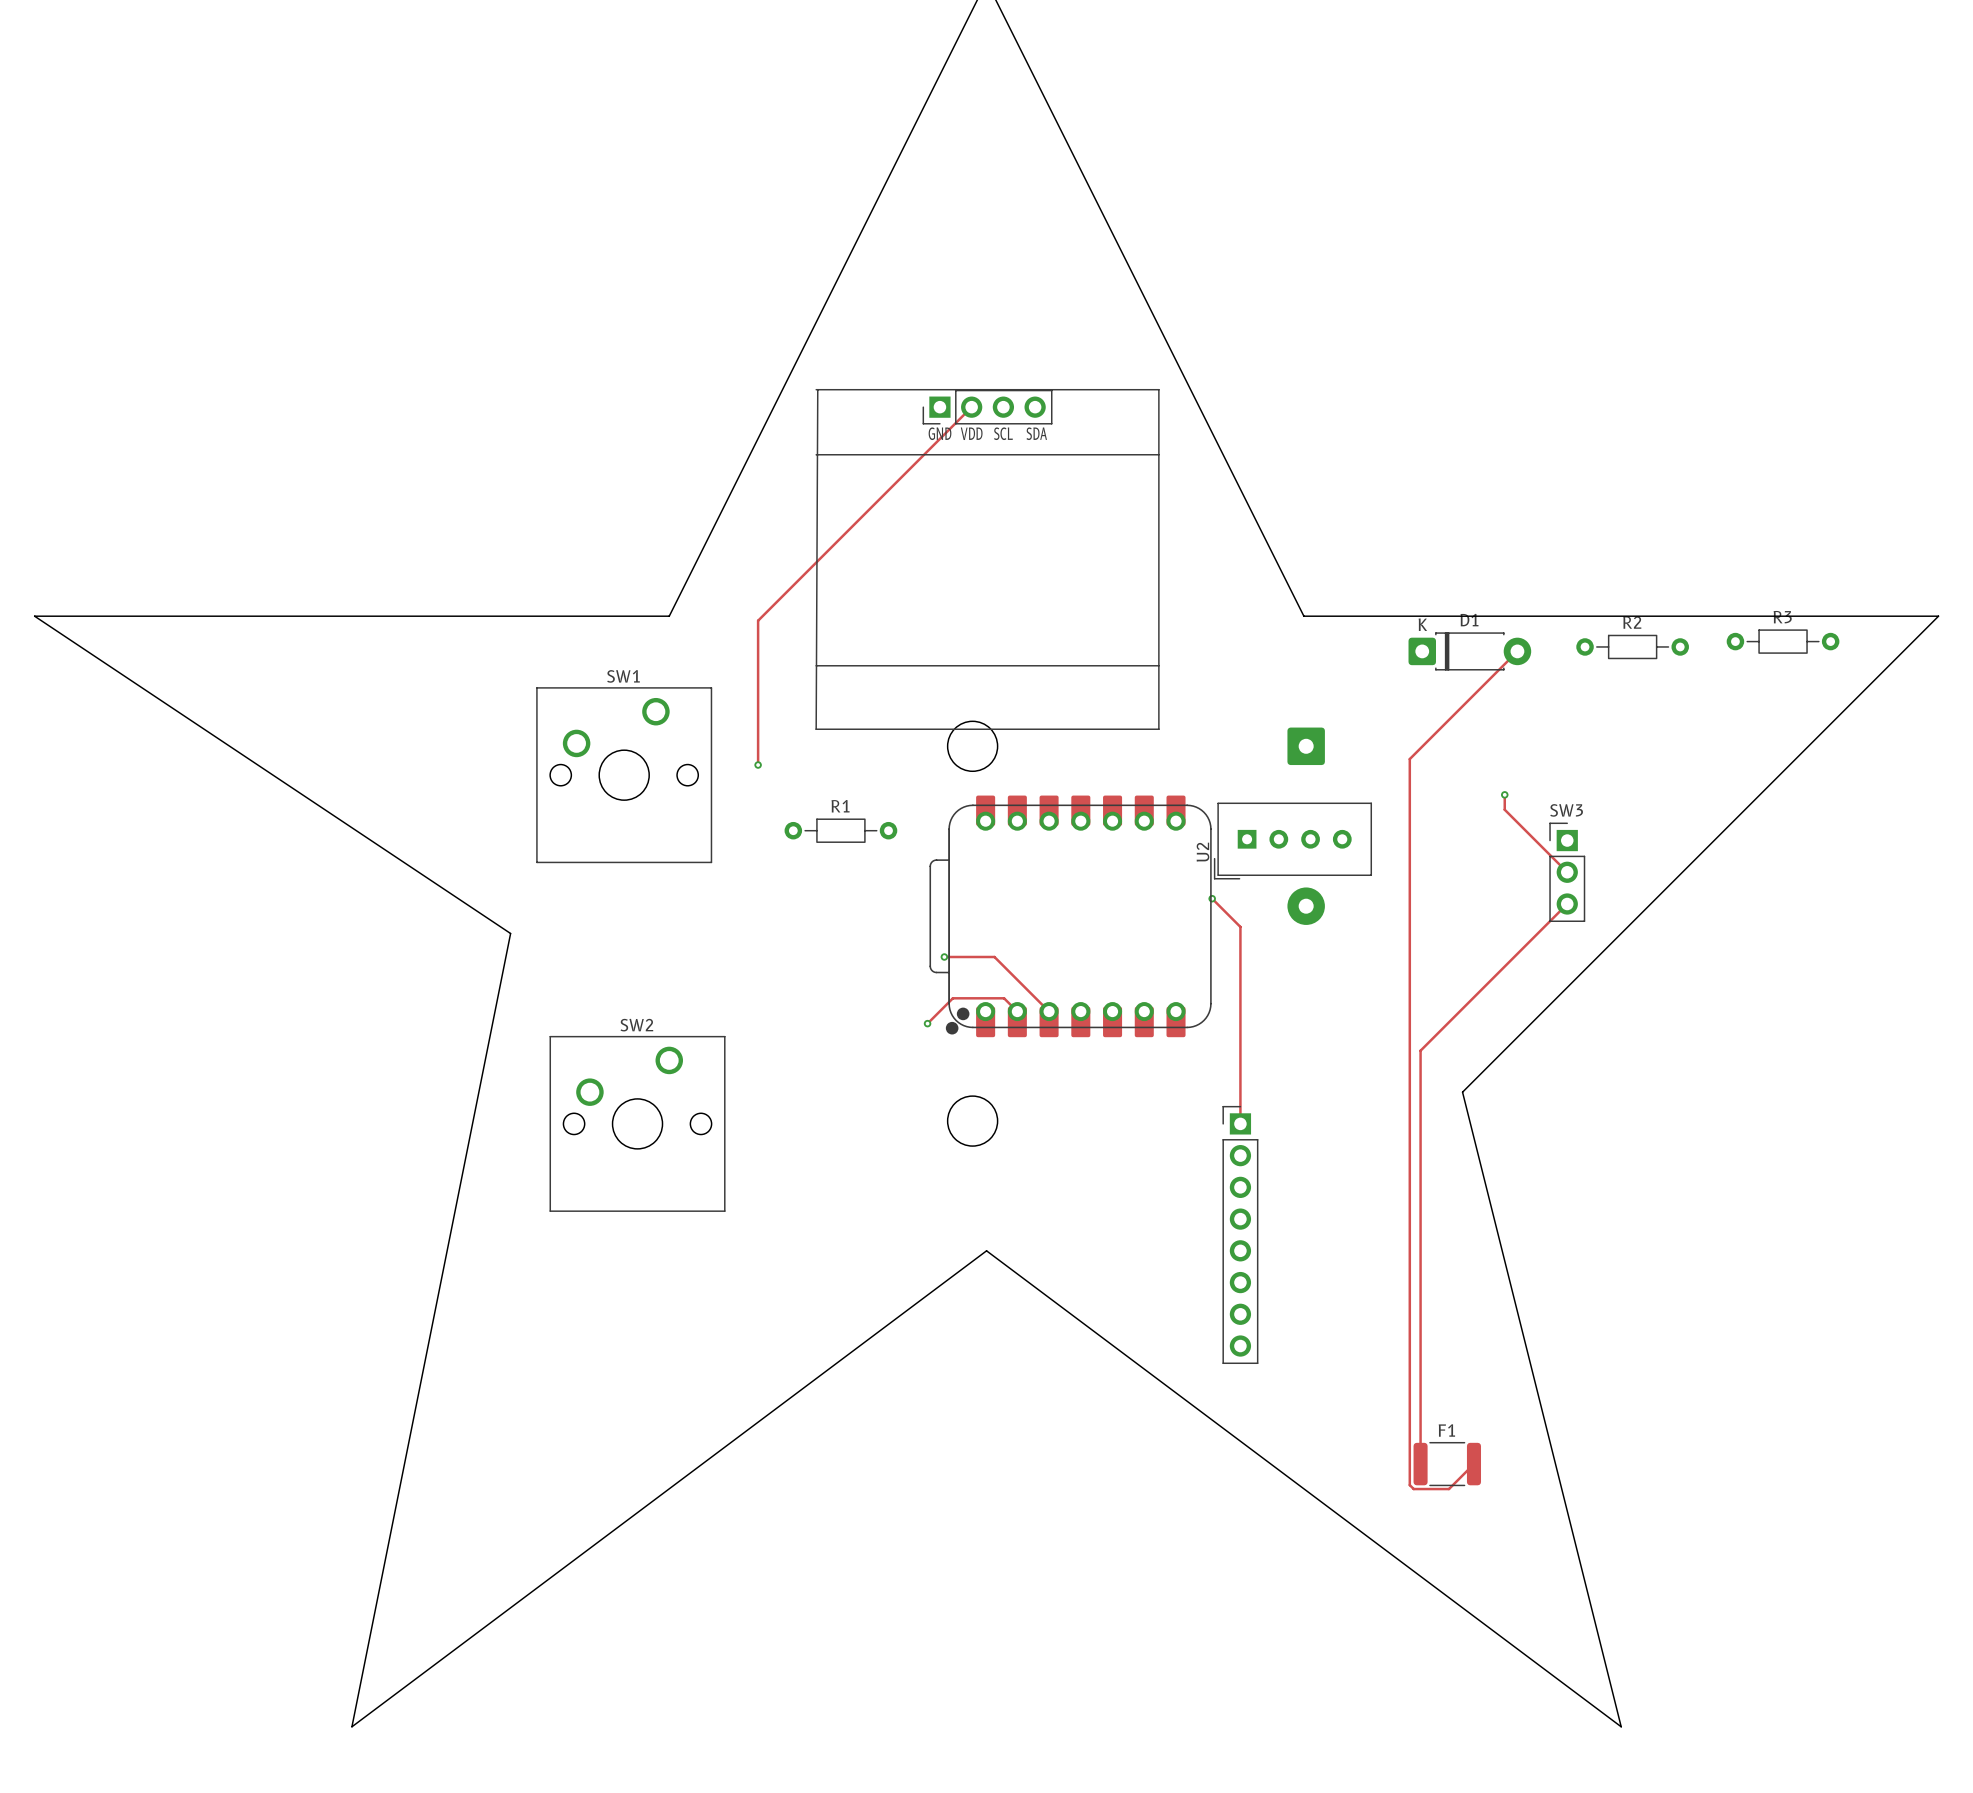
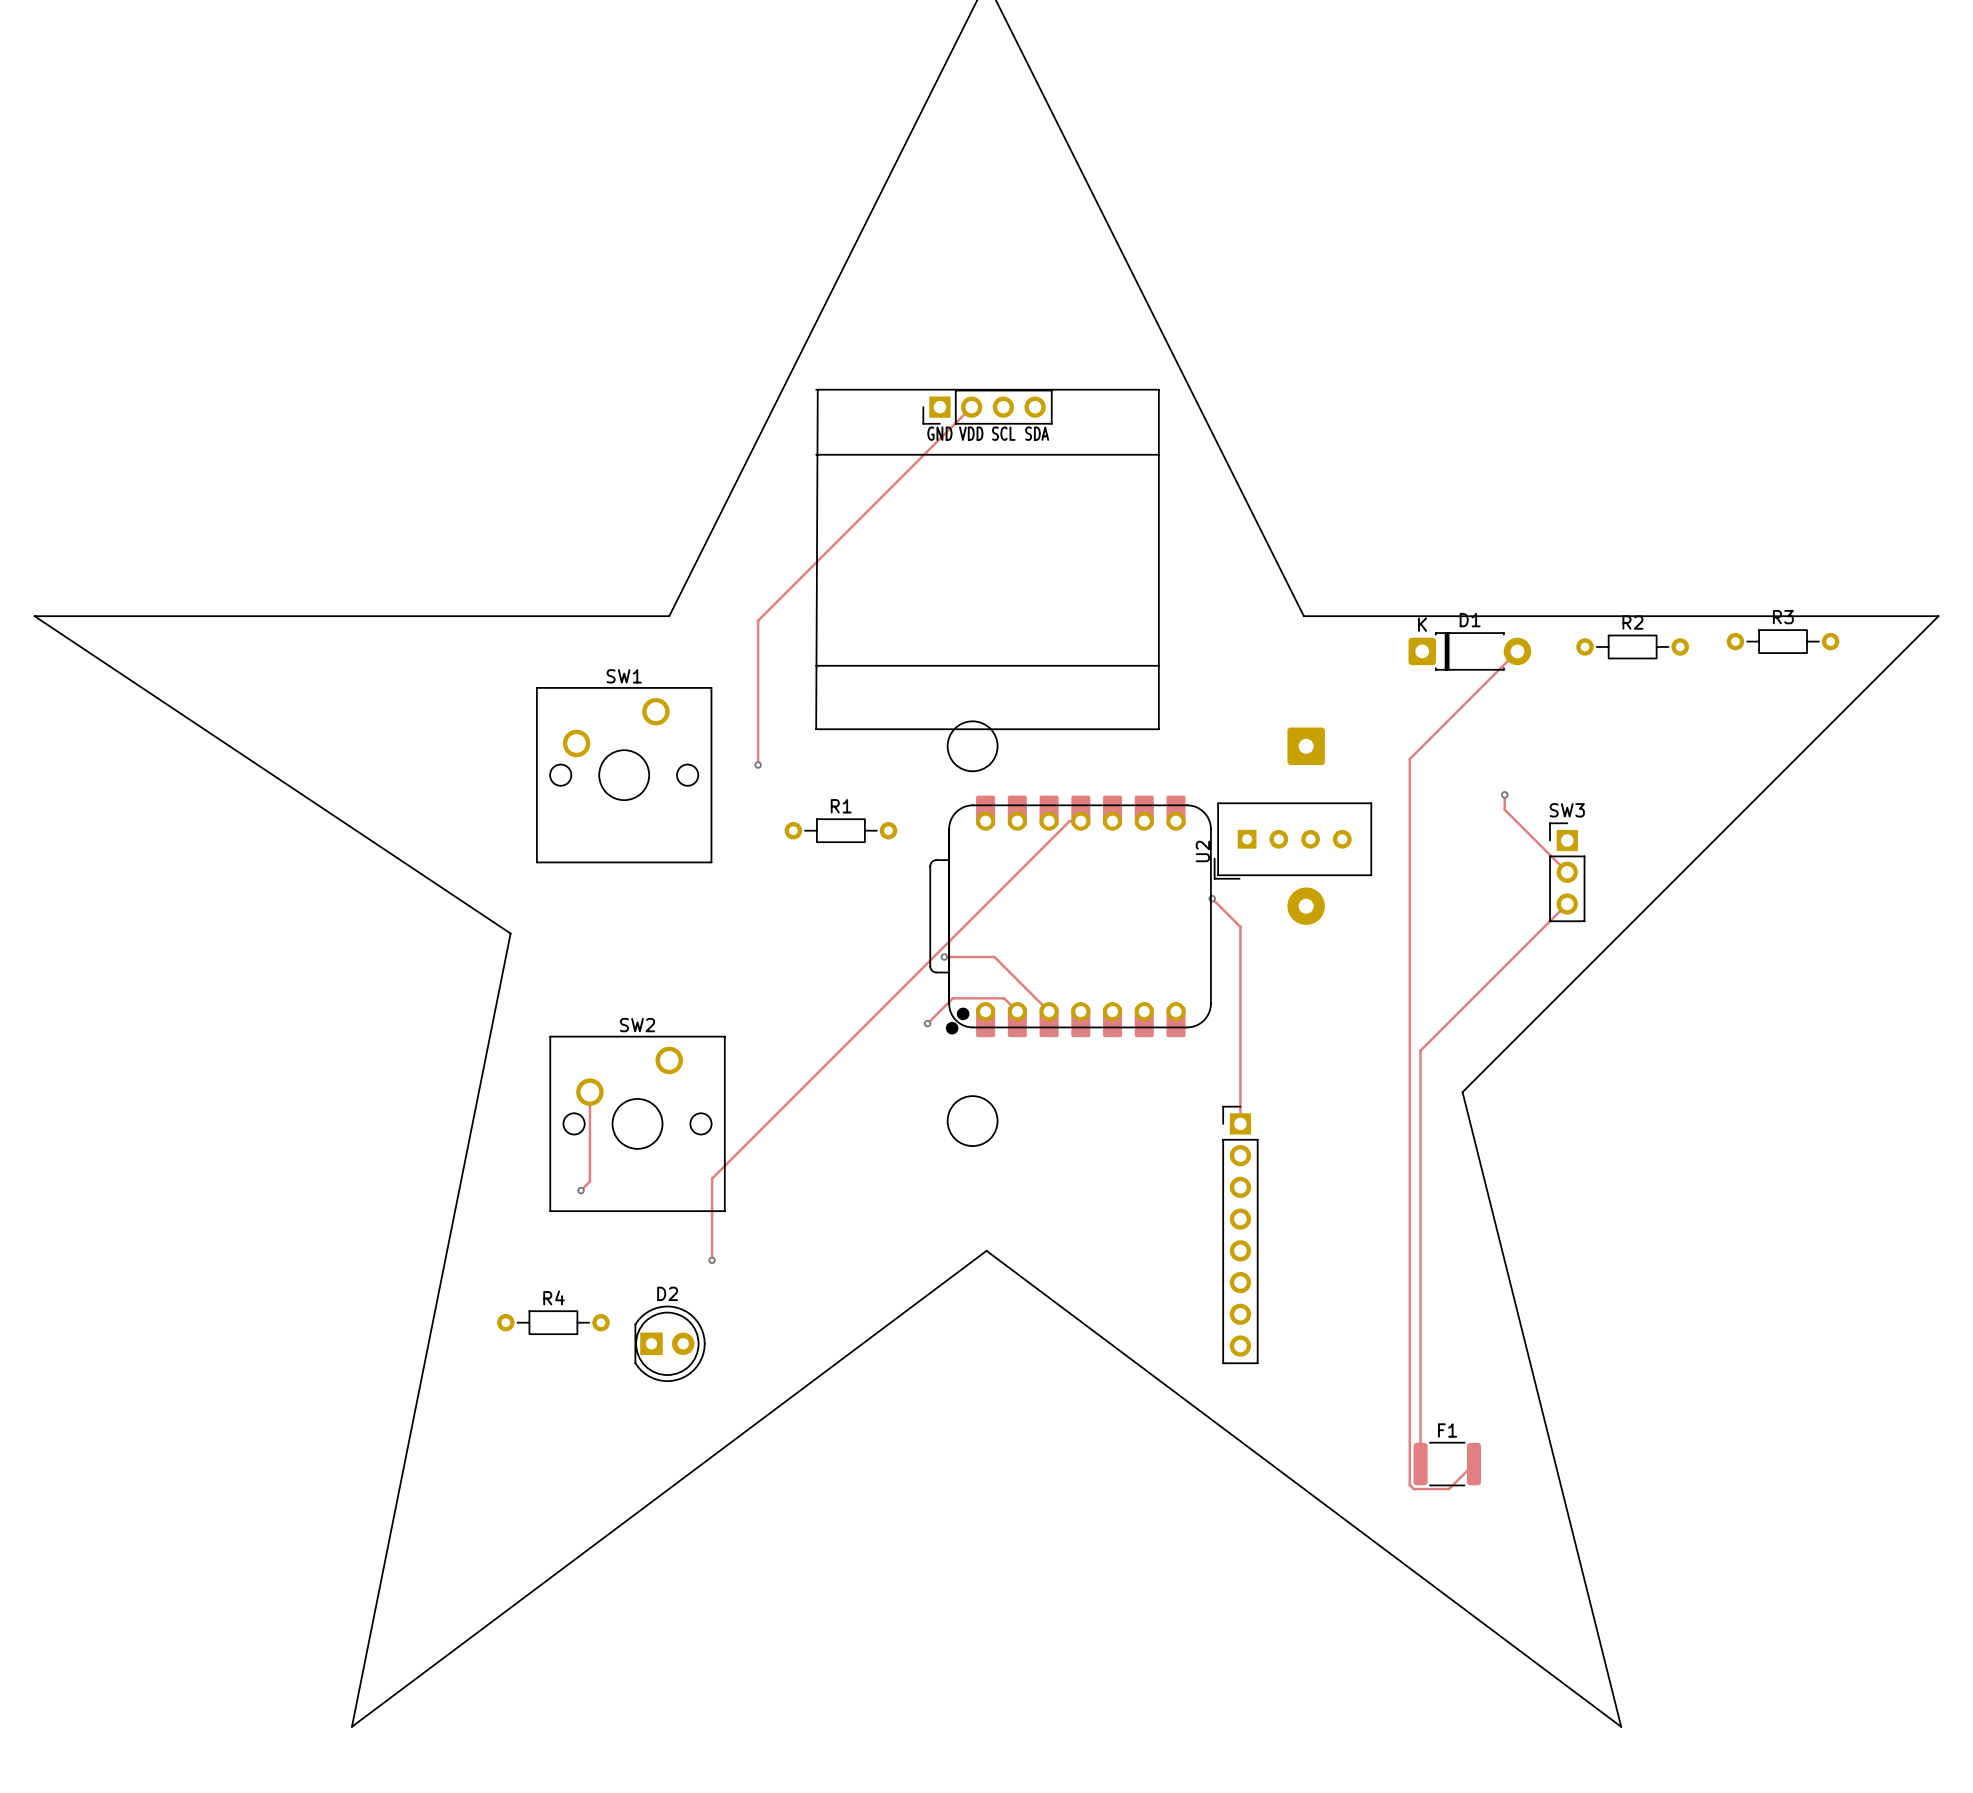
track: none -> (1080, 821) (1069, 821) (712, 1178) (712, 1260)
track: none -> (589, 1092) (589, 1181) (581, 1190)
via: none -> (581, 1190)
via: none -> (712, 1260)
R4: none -> (553, 1322)
D2: none -> (670, 1343)

